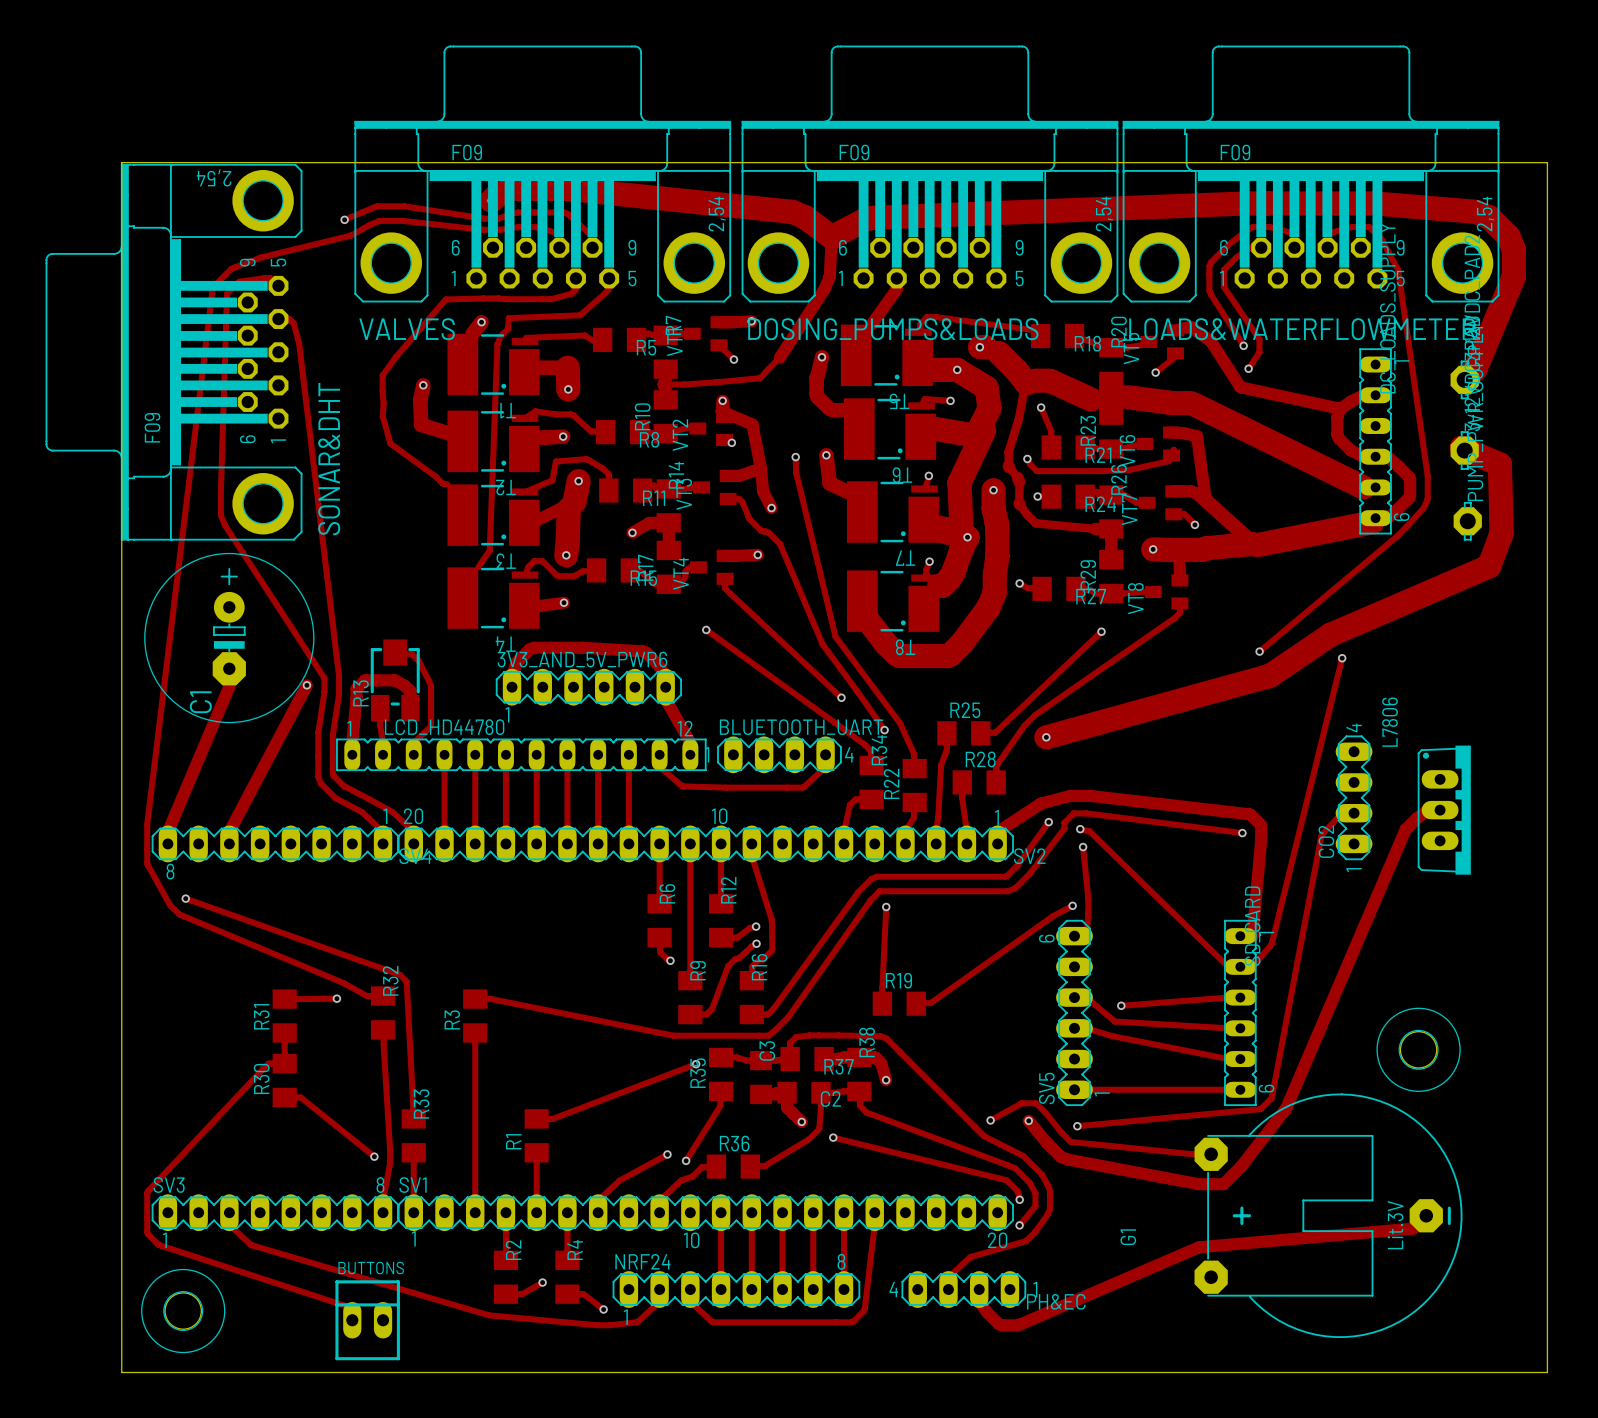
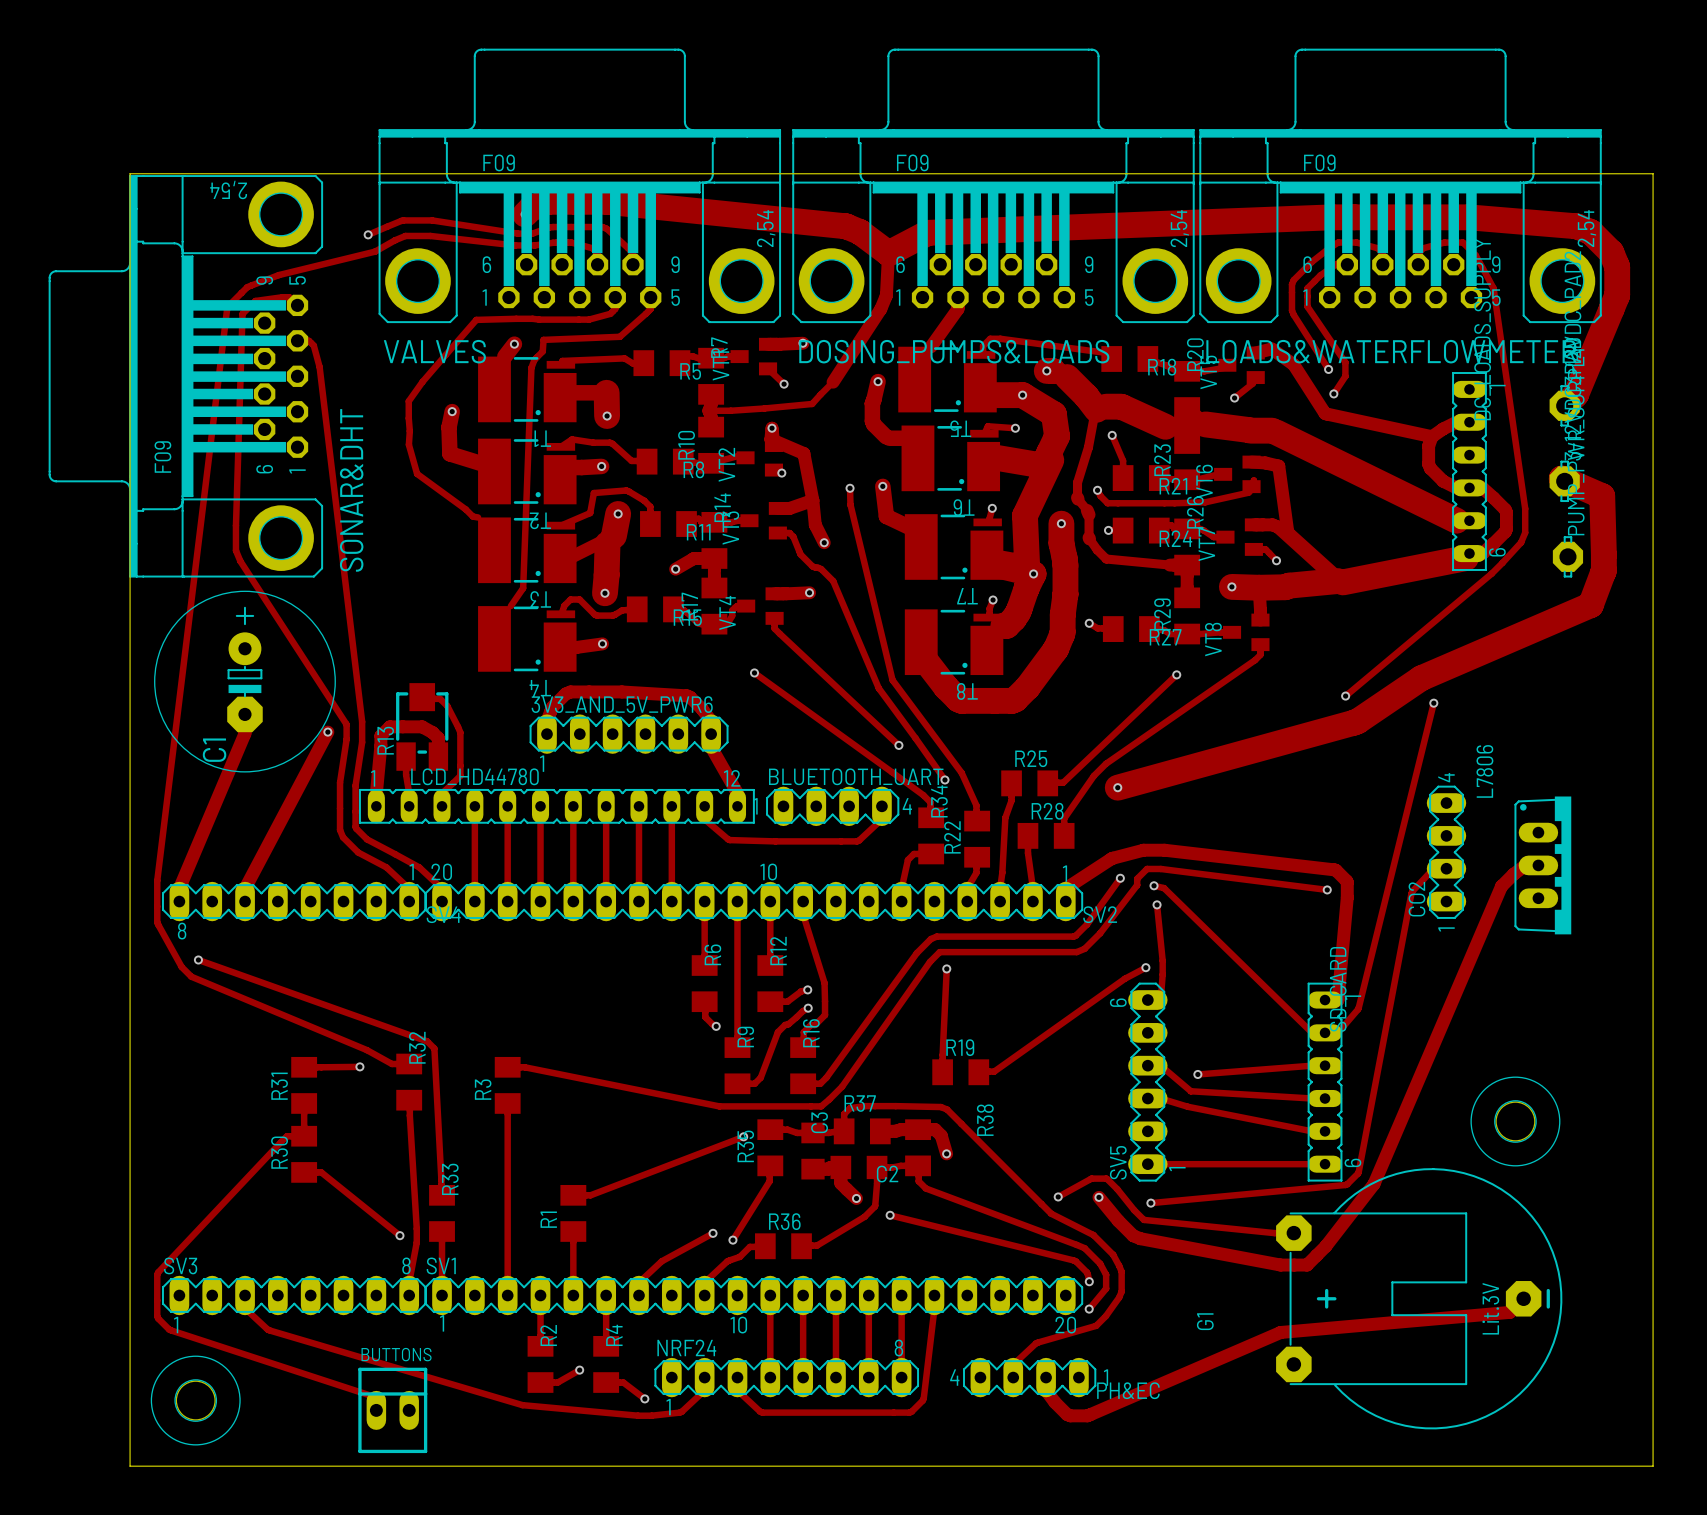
R38 name position: R38 (867, 1042) -> R38 (985, 1120)
R37 name position: R37 (839, 1066) -> R37 (860, 1103)

